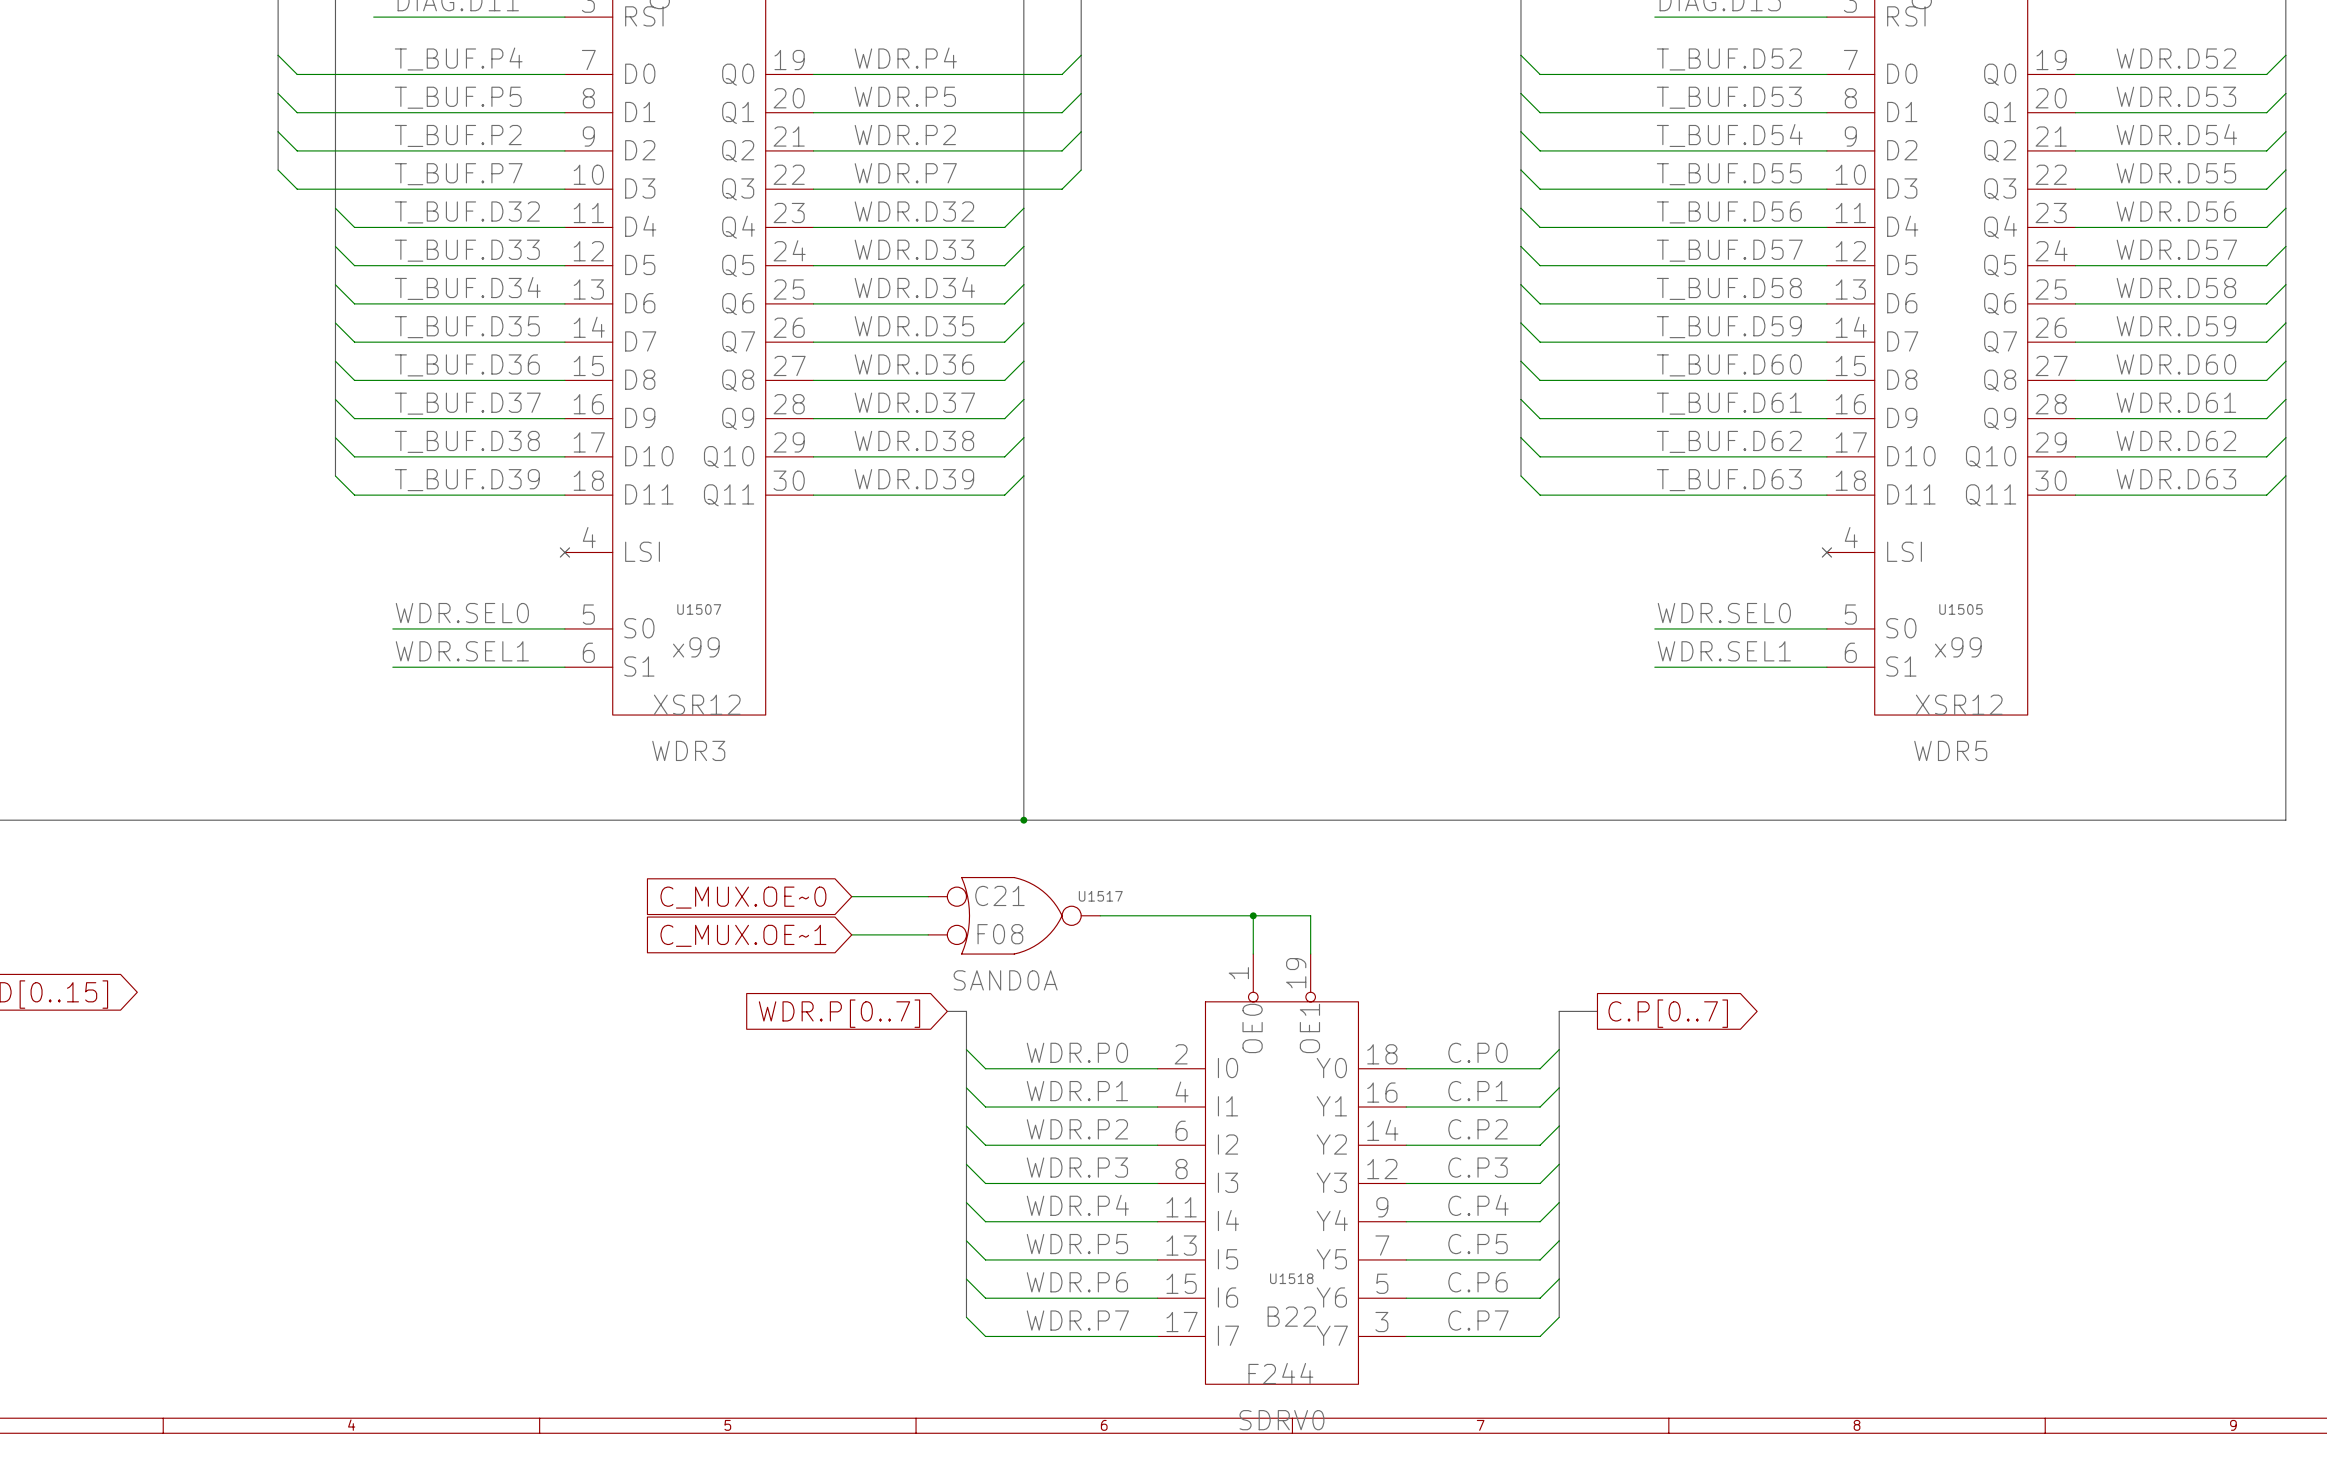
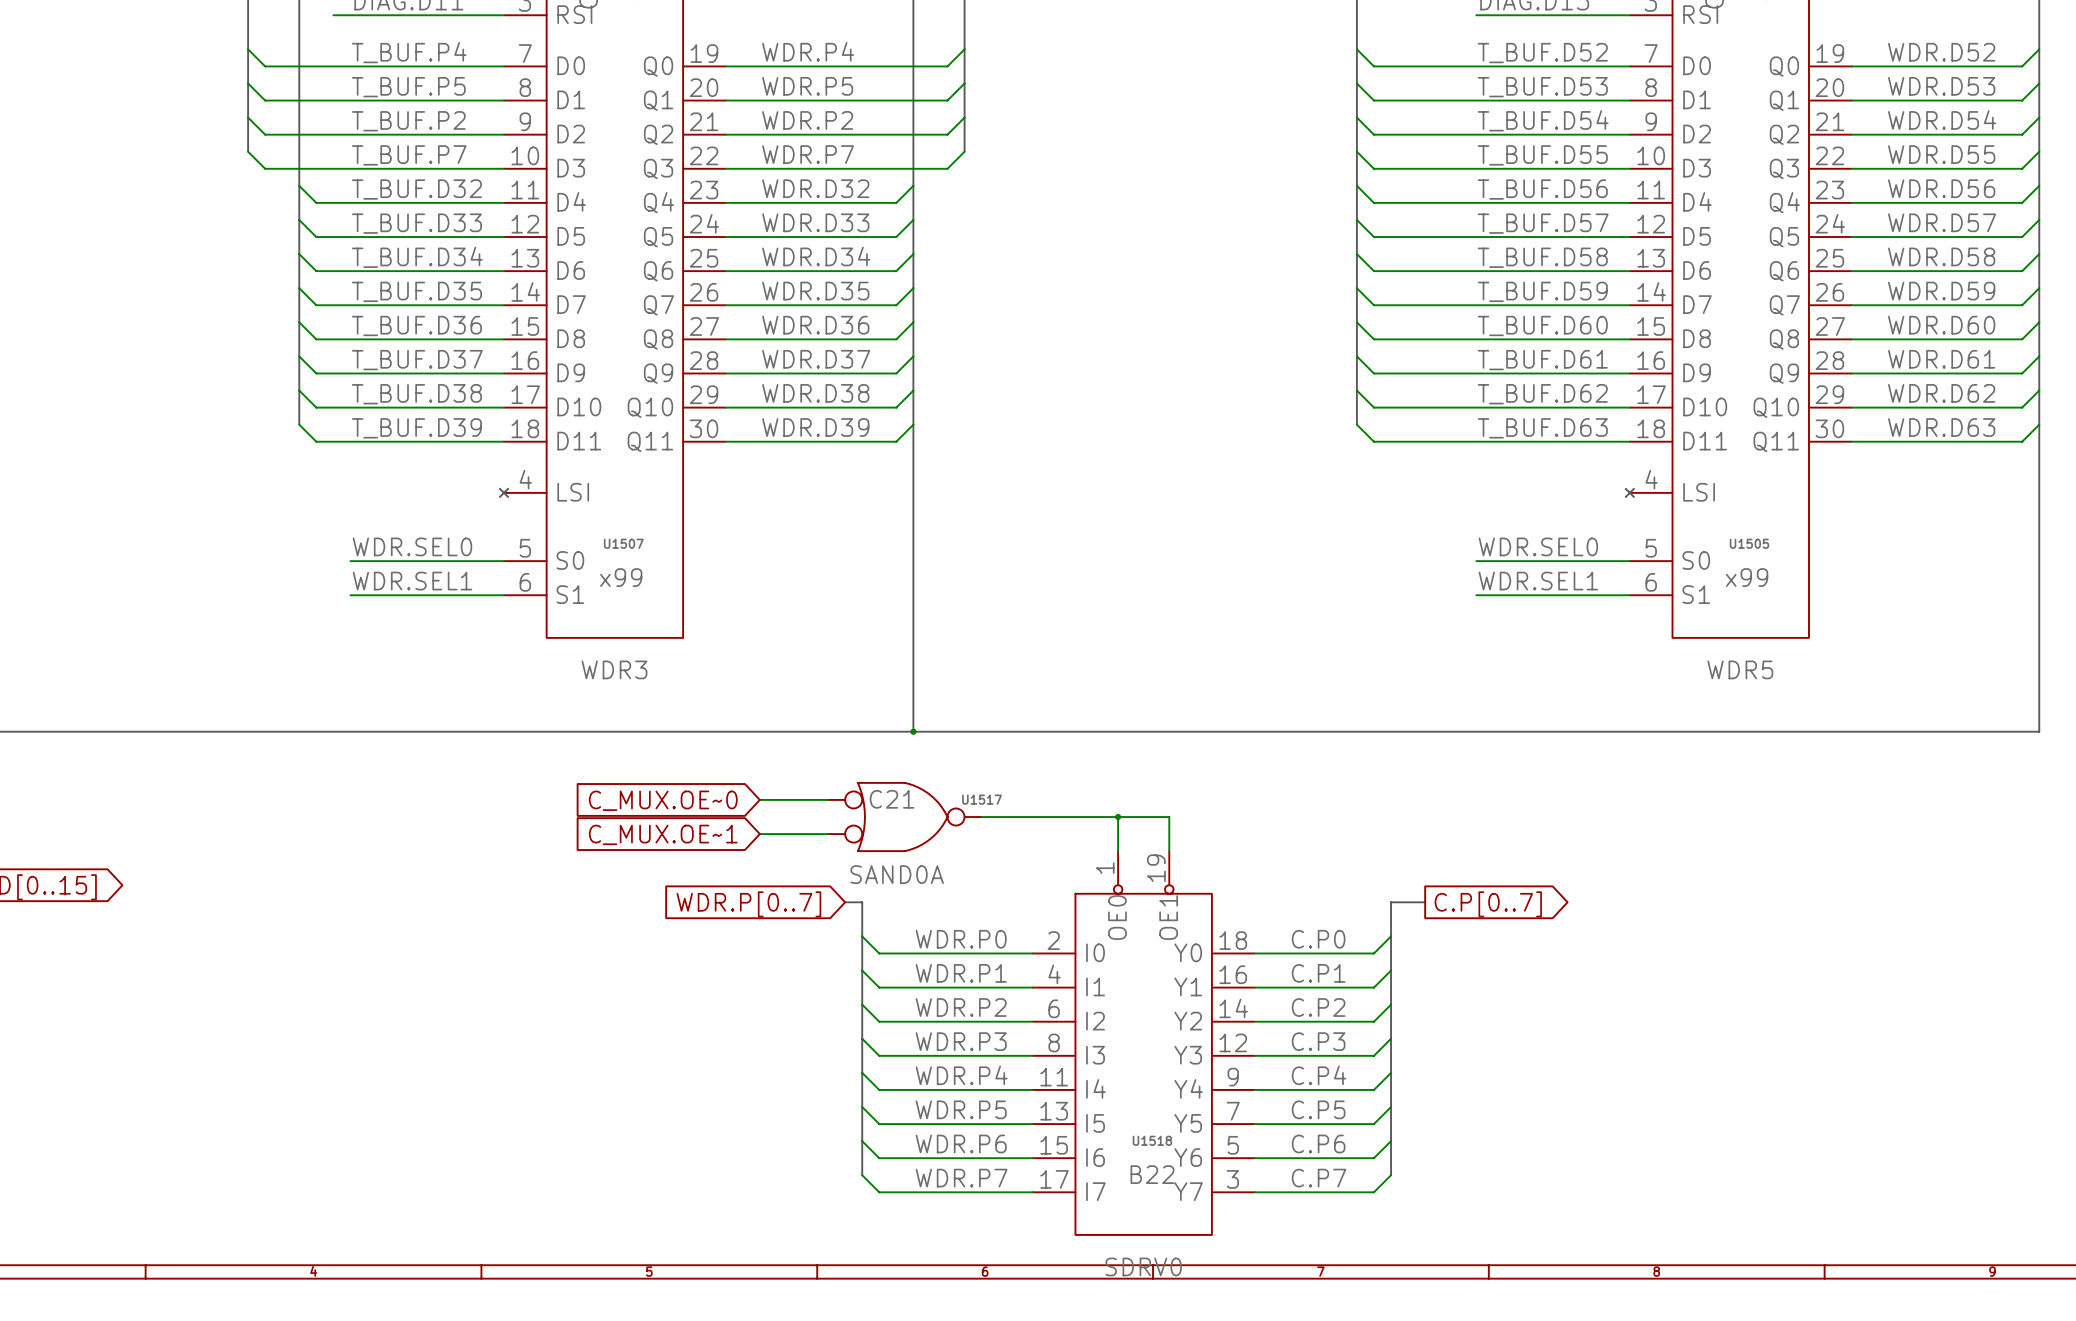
U1507 value: XSR12 (697, 704) -> none
U1505 value: XSR12 (1959, 704) -> none
U1517 value: F08 (1000, 934) -> none
U1518 value: F244 (1280, 1373) -> none

